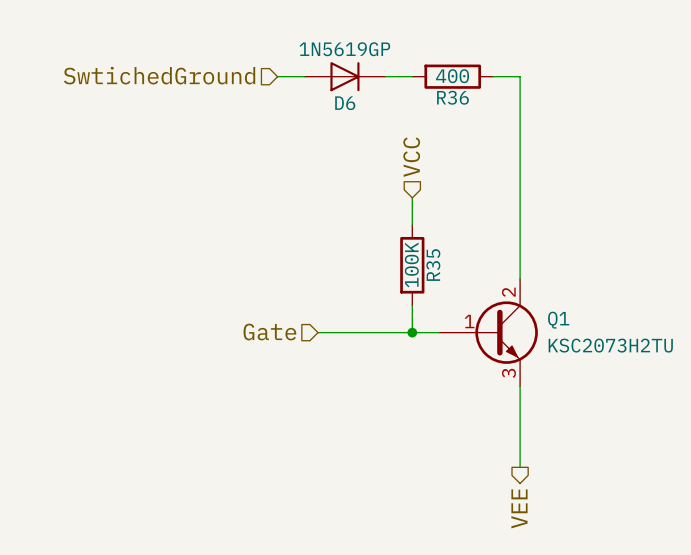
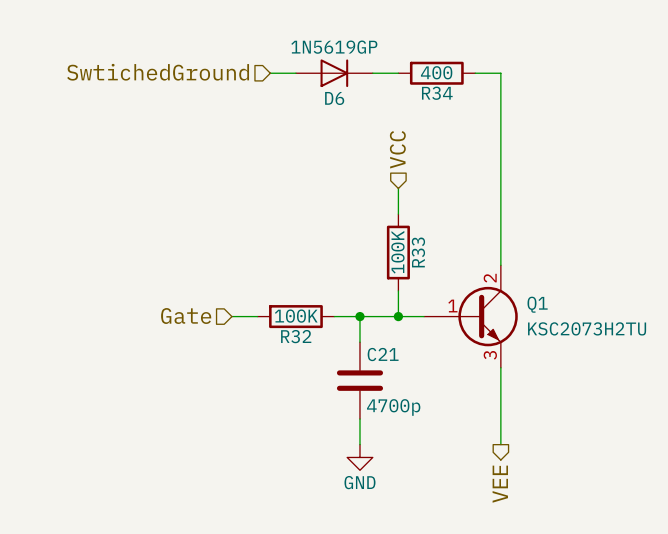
R36 name: R36 (452, 97) -> R34 (437, 93)
R35 name: R35 (433, 265) -> R33 (418, 252)
hierarchical label position: Gate (269, 332) -> Gate (186, 316)
R32: none -> 100K (295, 316)
wire: none -> (359, 316) (359, 342)
junction: none -> (359, 316)
C21: none -> 4700p (359, 380)
wire: none -> (359, 419) (359, 444)
power symbol: none -> GND (359, 457)

